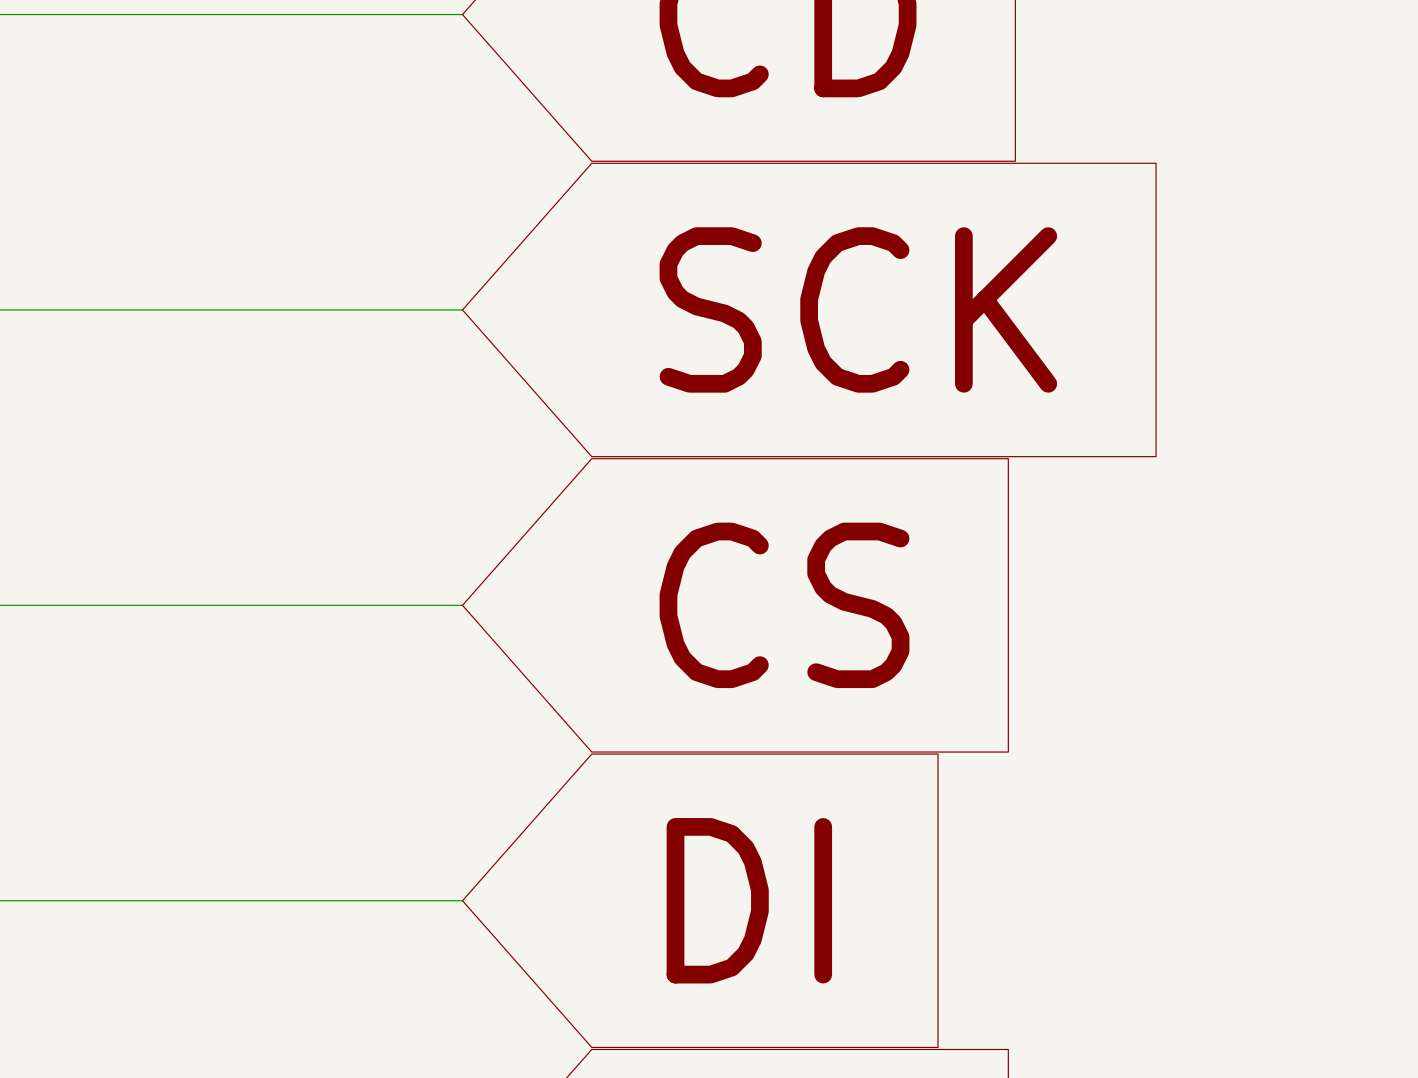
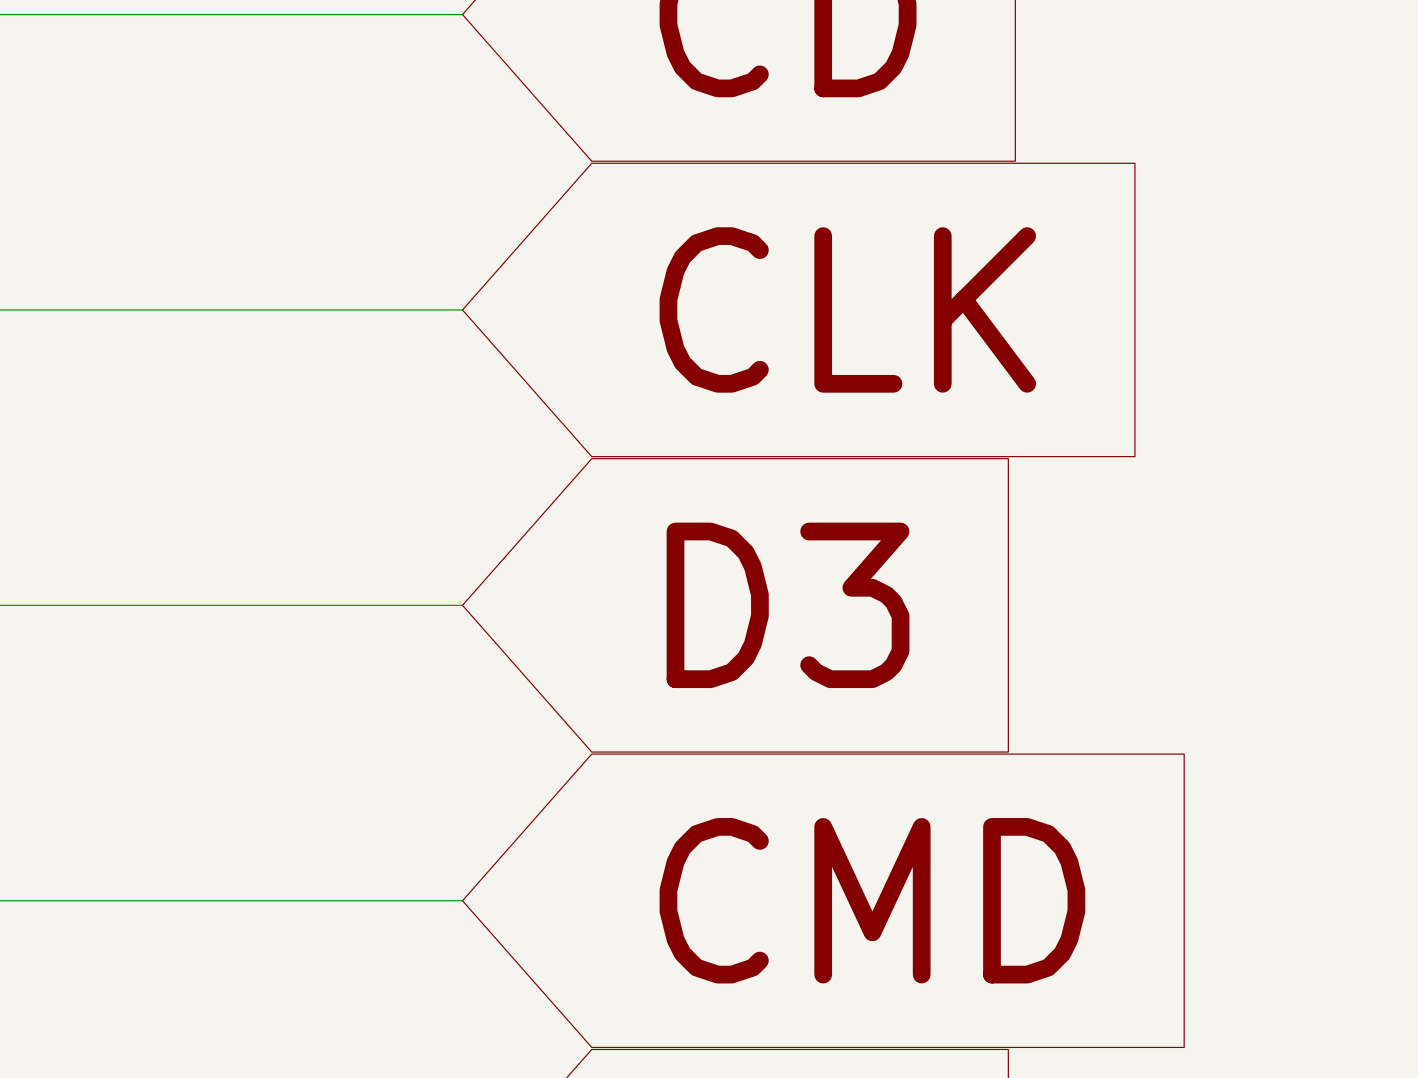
global label: SCK (858, 309) -> CLK (847, 309)
global label: CS (784, 605) -> D3 (788, 605)
global label: DI (749, 900) -> CMD (872, 900)

